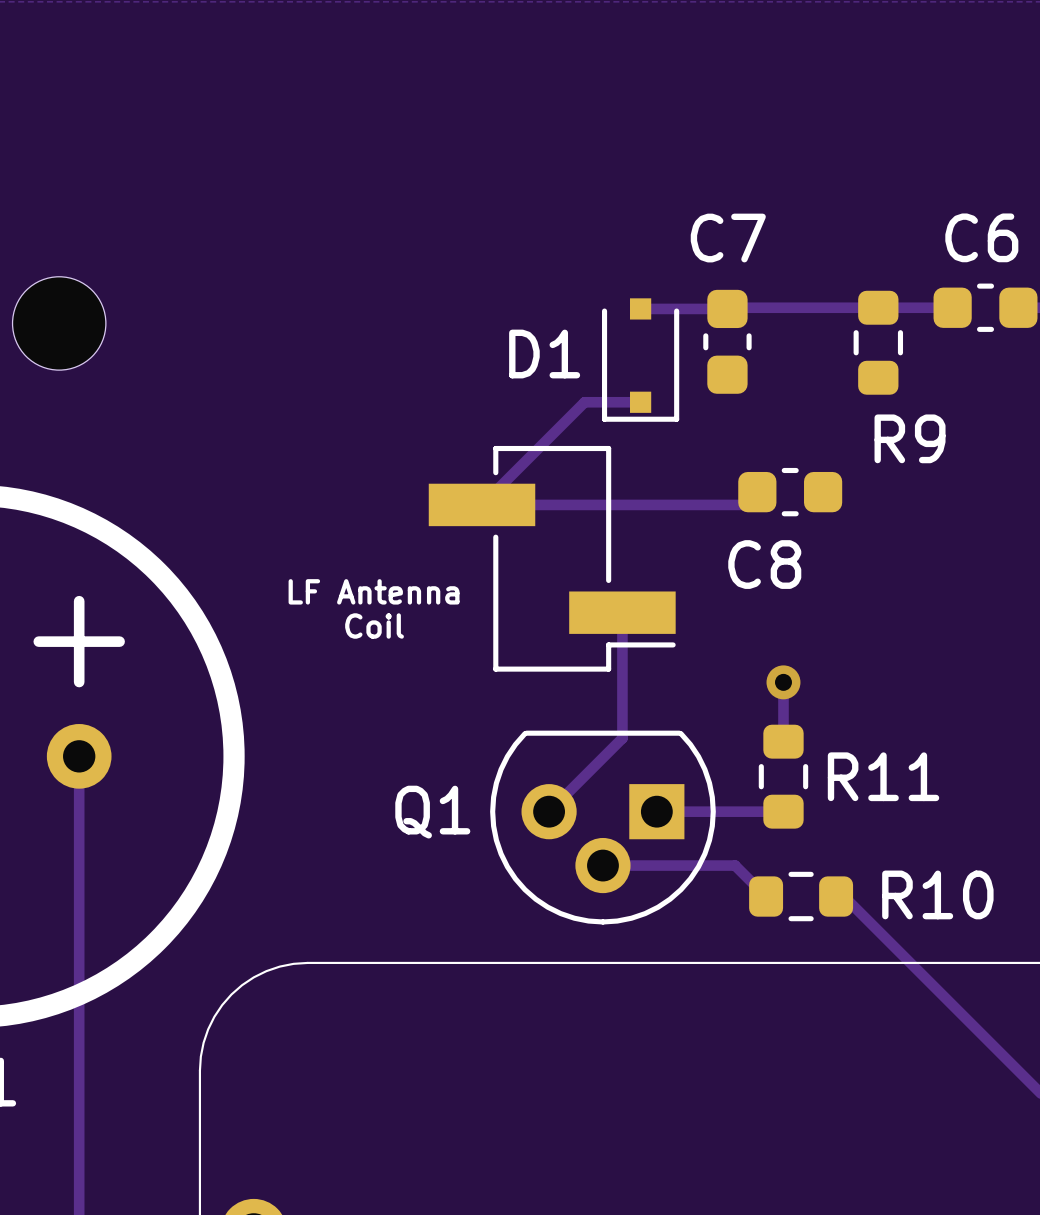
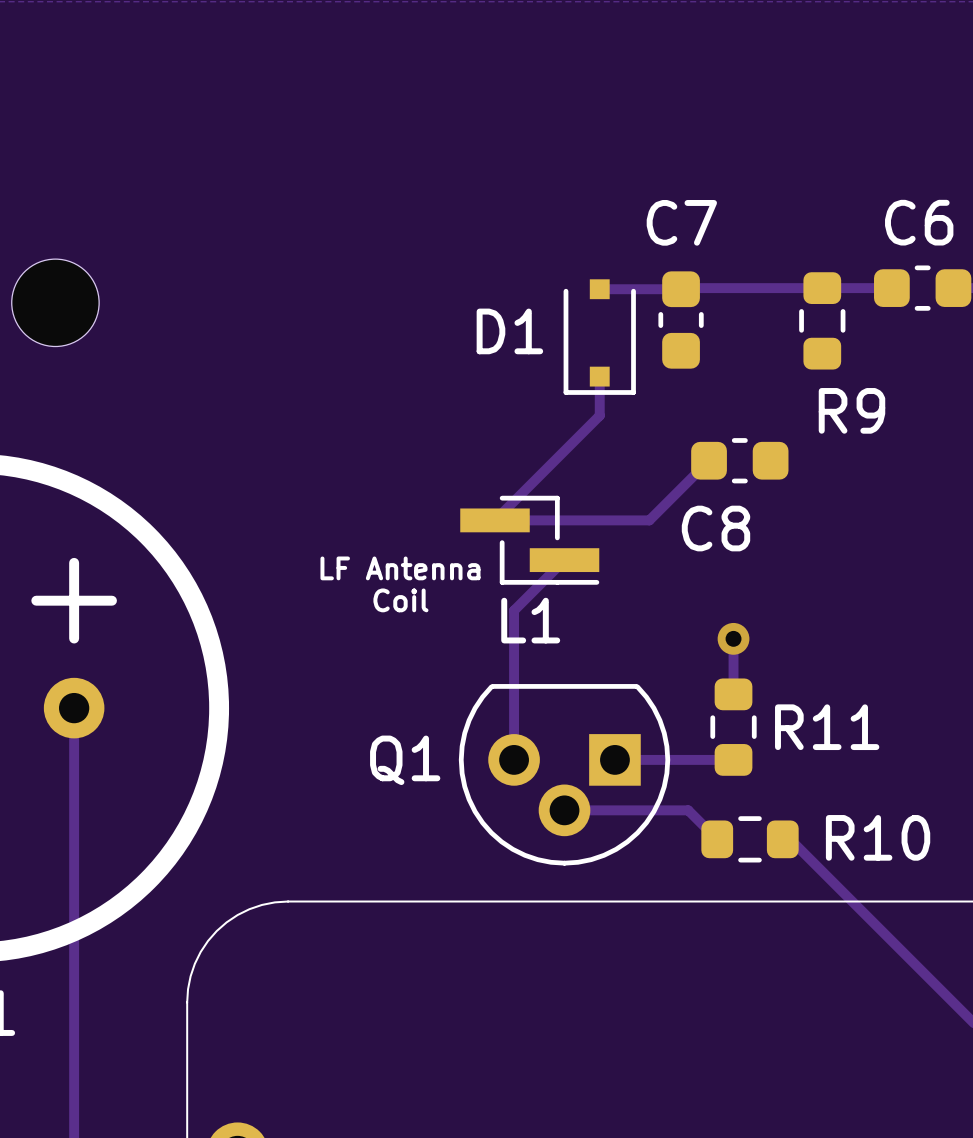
track: (640, 402) (584, 402) (482, 504) (744, 504) (757, 492) -> (599, 376) (599, 415) (495, 520) (649, 520) (709, 460)
part: (552, 558) -> none
L1: none -> (529, 540)
text position: LF Antenna (374, 591) -> LF Antenna (400, 568)
track: (622, 612) (622, 738) (549, 811) -> (564, 560) (514, 610) (514, 759)
text position: Coil (374, 626) -> Coil (400, 600)

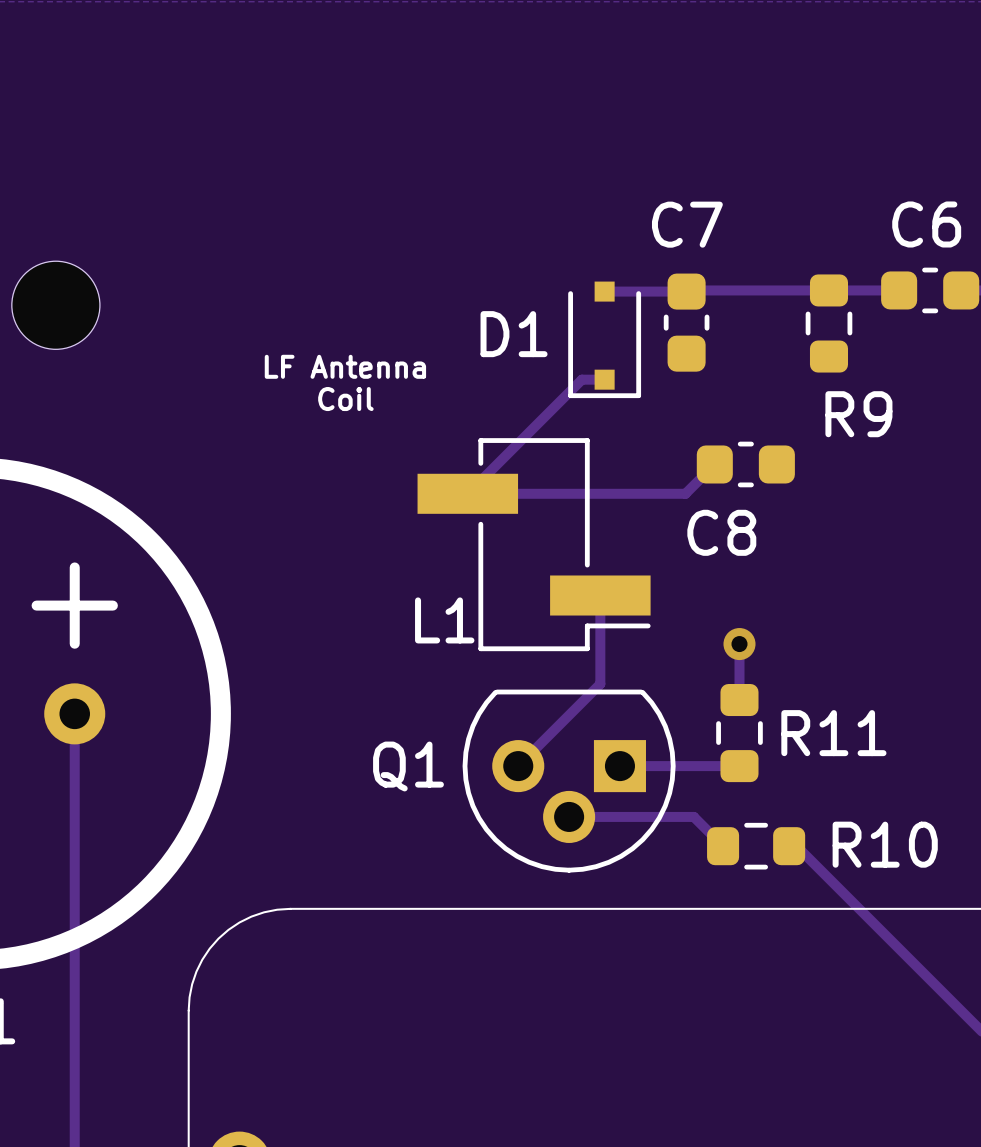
track: (599, 376) (599, 415) (495, 520) (649, 520) (679, 489) -> (604, 379) (581, 379) (467, 493) (685, 493)
L1 footprint: [460, 495, 600, 585] -> [417, 438, 651, 652]
track: (564, 560) (514, 610) (514, 759) -> (600, 595) (600, 684) (518, 766)
text position: LF Antenna (400, 568) -> LF Antenna (345, 366)
text position: Coil (400, 600) -> Coil (345, 399)
L1 name position: L1 (530, 620) -> L1 (444, 620)

